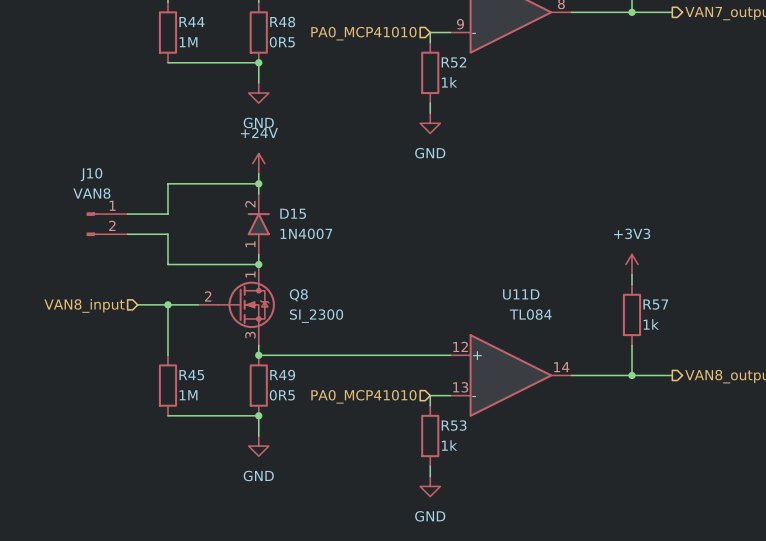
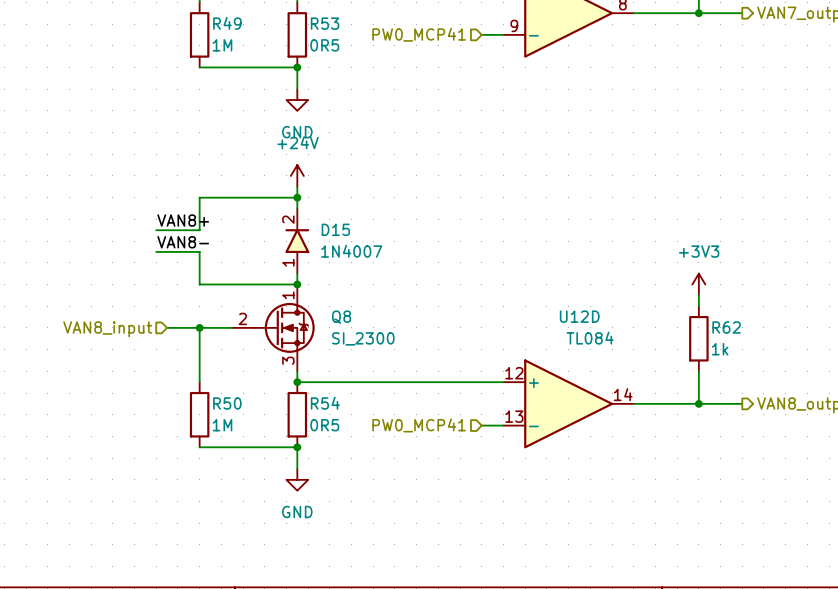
R44 name: R44 (191, 22) -> R49 (227, 23)
R48 name: R48 (282, 22) -> R53 (325, 23)
wire: (430, 32) (430, 42) -> none
hierarchical label: PA0_MCP41010 (363, 33) -> PW0_MCP41 (419, 34)
R52: 1k (430, 72) -> none
wire: (430, 103) (430, 113) -> none
power symbol: GND (430, 123) -> none
label: none -> VAN8+ (183, 220)
J10: VAN8 (107, 224) -> none
label: none -> VAN8- (183, 242)
U11D name: U11D (521, 294) -> U12D (579, 316)
R57 name: R57 (655, 304) -> R62 (726, 327)
R45 name: R45 (191, 375) -> R50 (227, 403)
R49 name: R49 (282, 375) -> R54 (325, 403)
wire: (430, 395) (430, 405) -> none
hierarchical label: PA0_MCP41010 (363, 396) -> PW0_MCP41 (419, 425)
R53: 1k (430, 436) -> none
wire: (430, 466) (430, 476) -> none
power symbol: GND (430, 486) -> none

